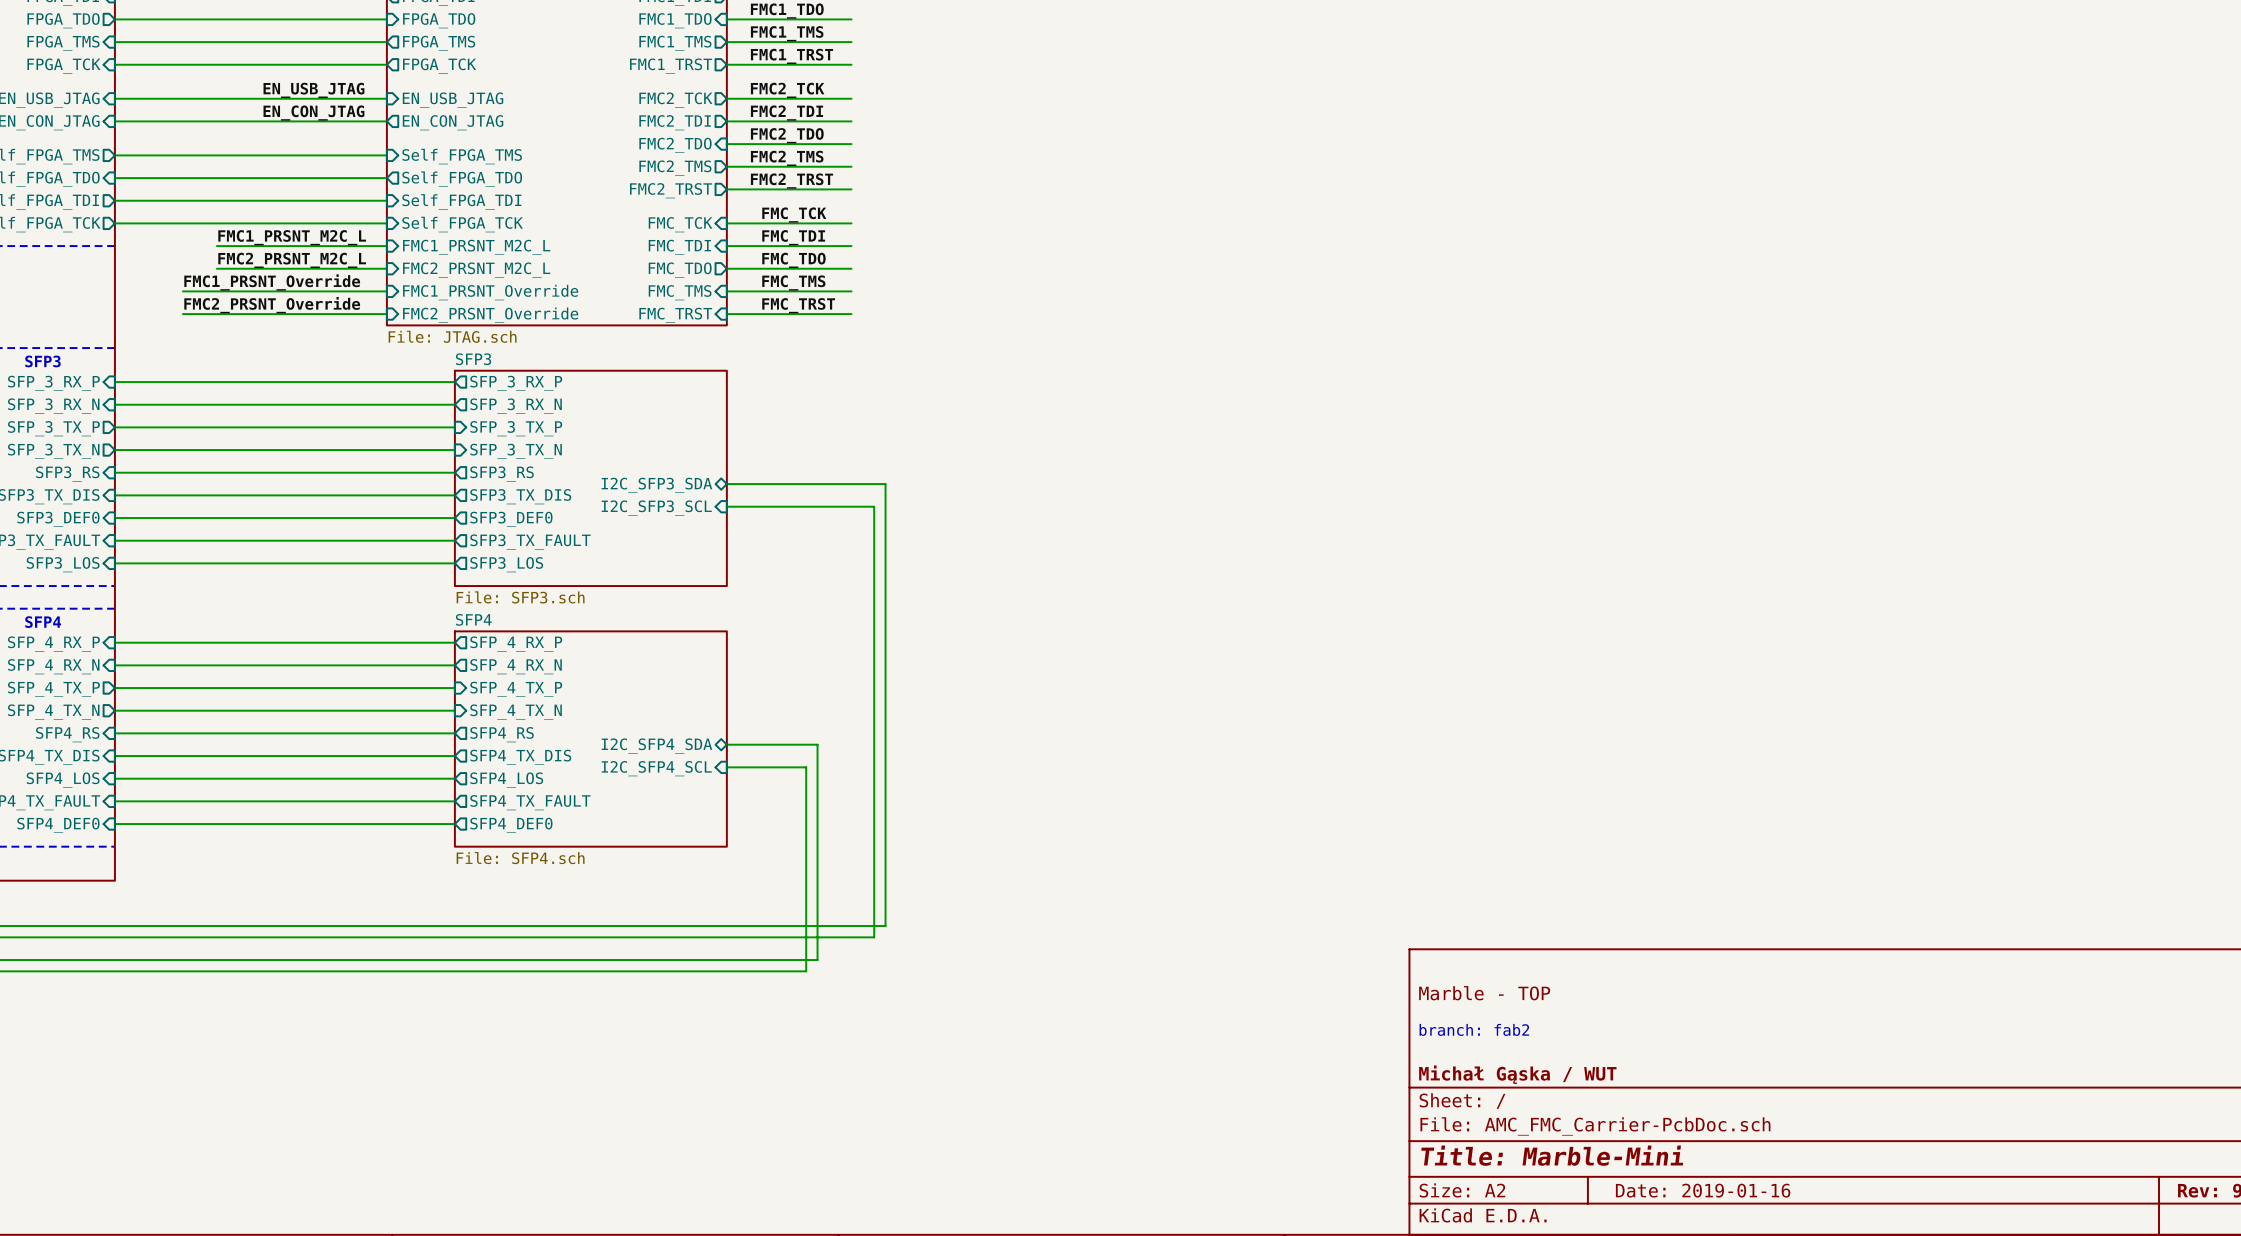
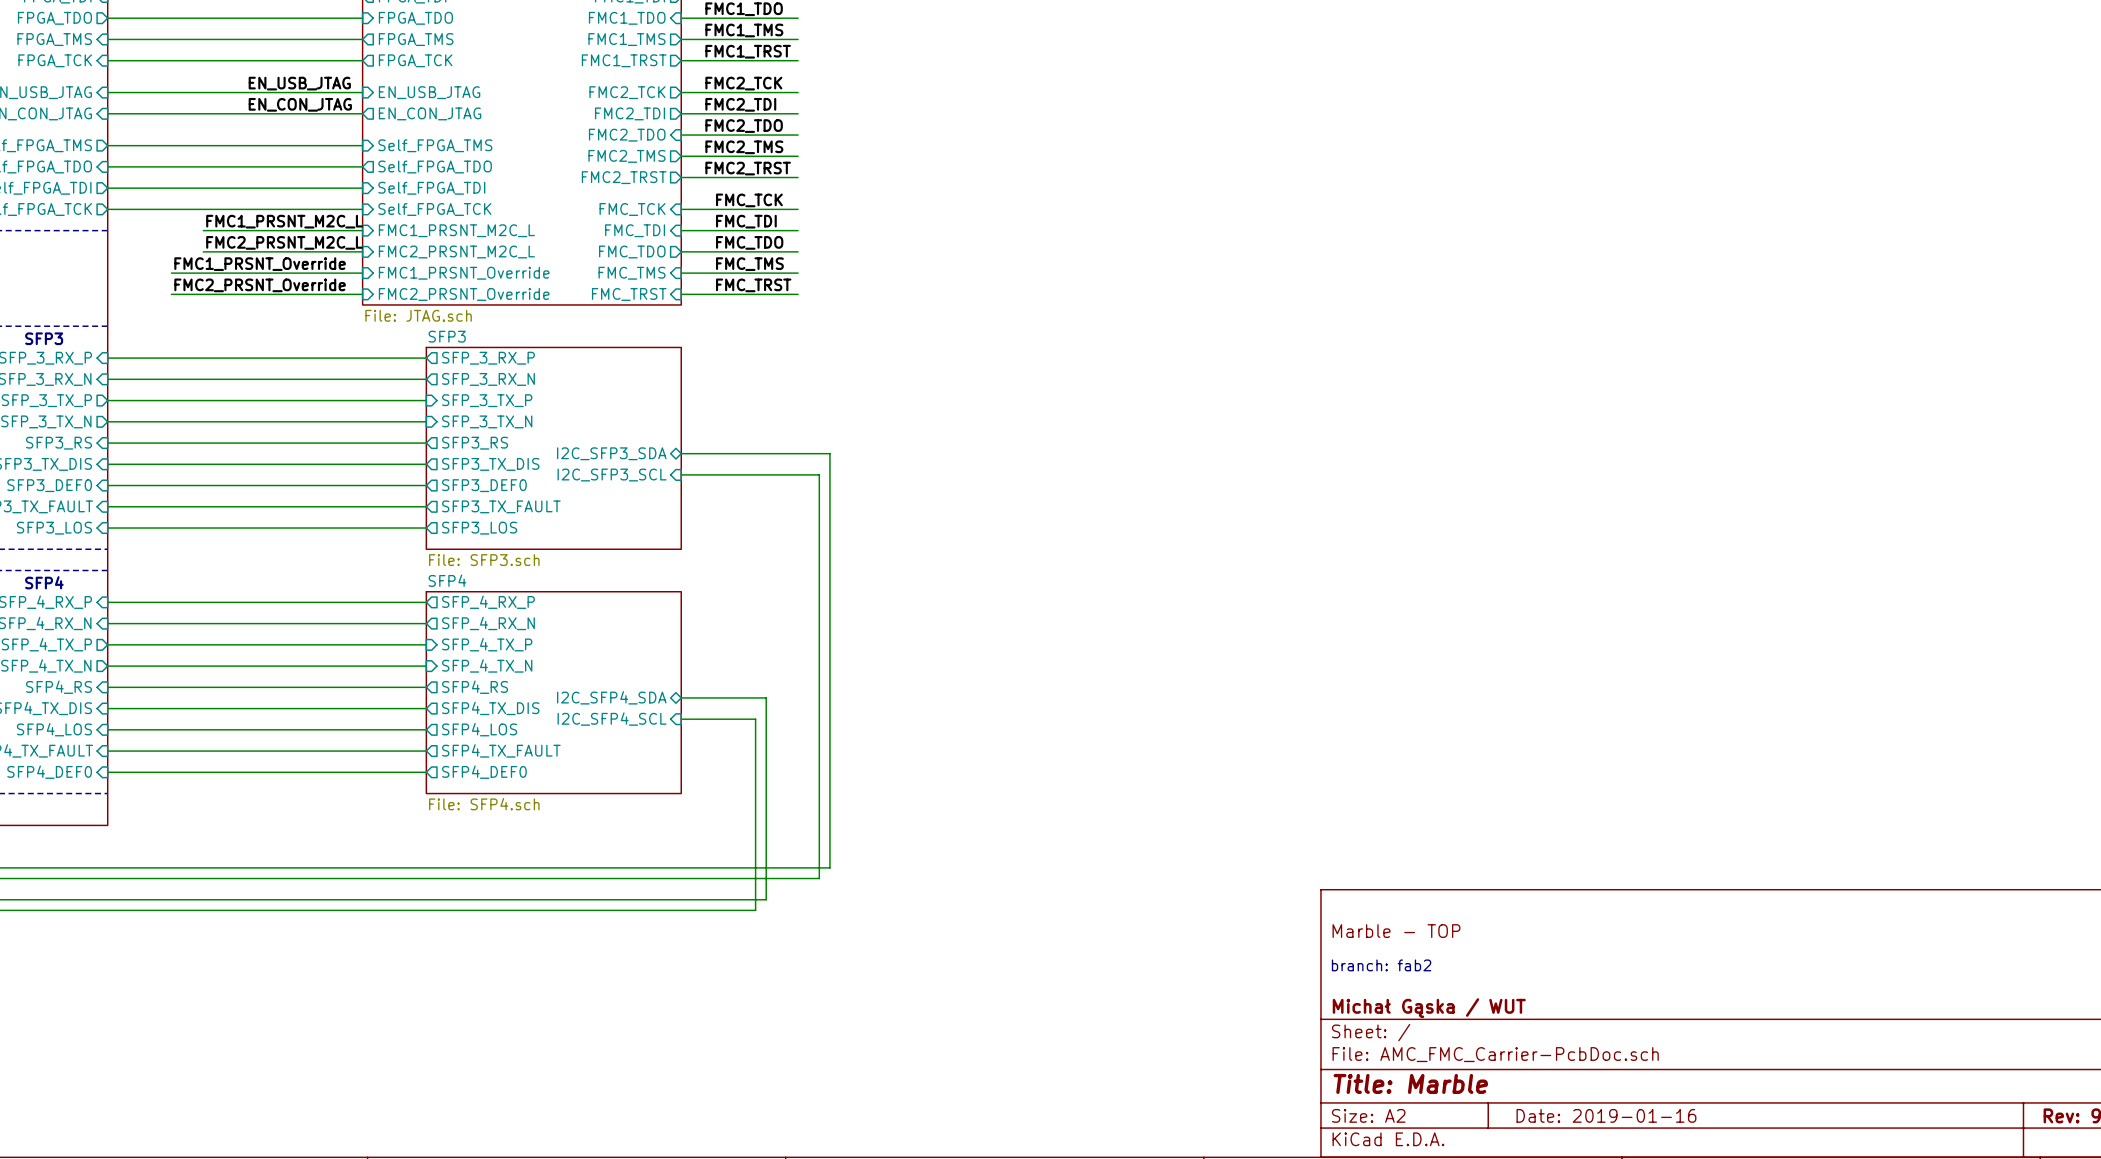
title block: Title: Marble-Mini (1552, 1155) -> Title: Marble (1410, 1083)

